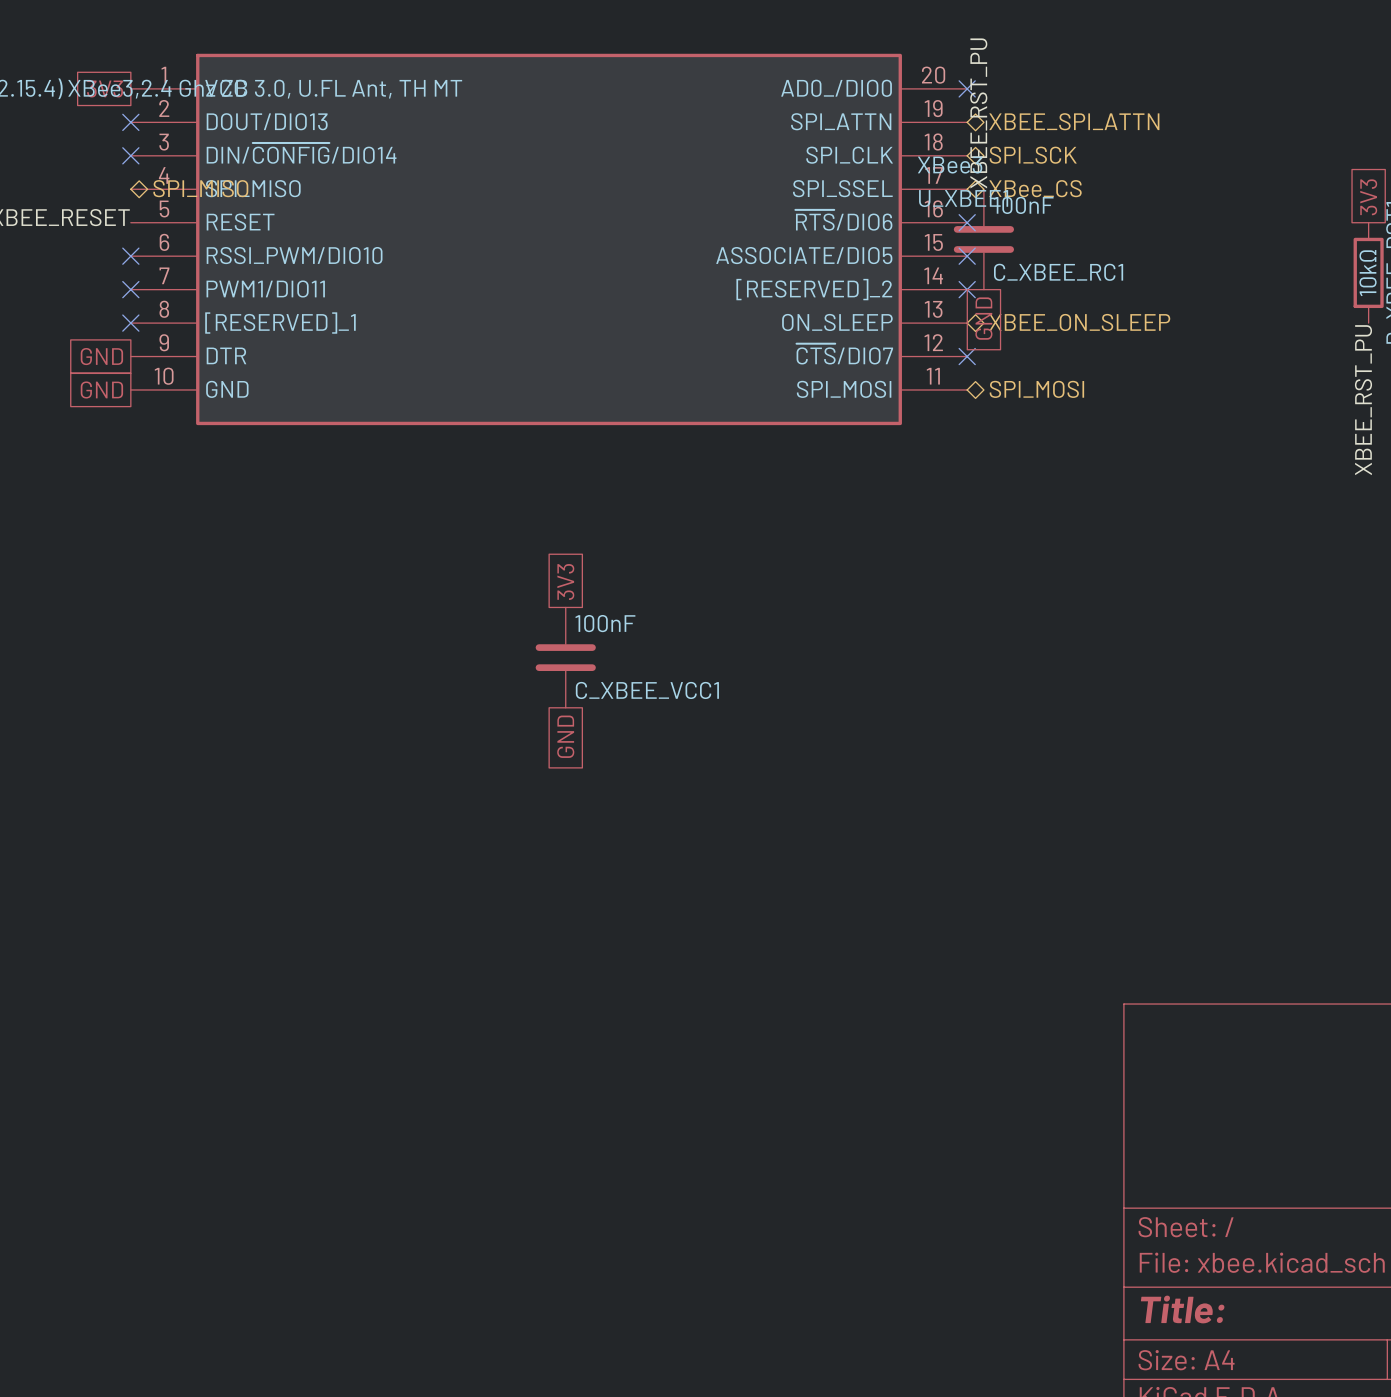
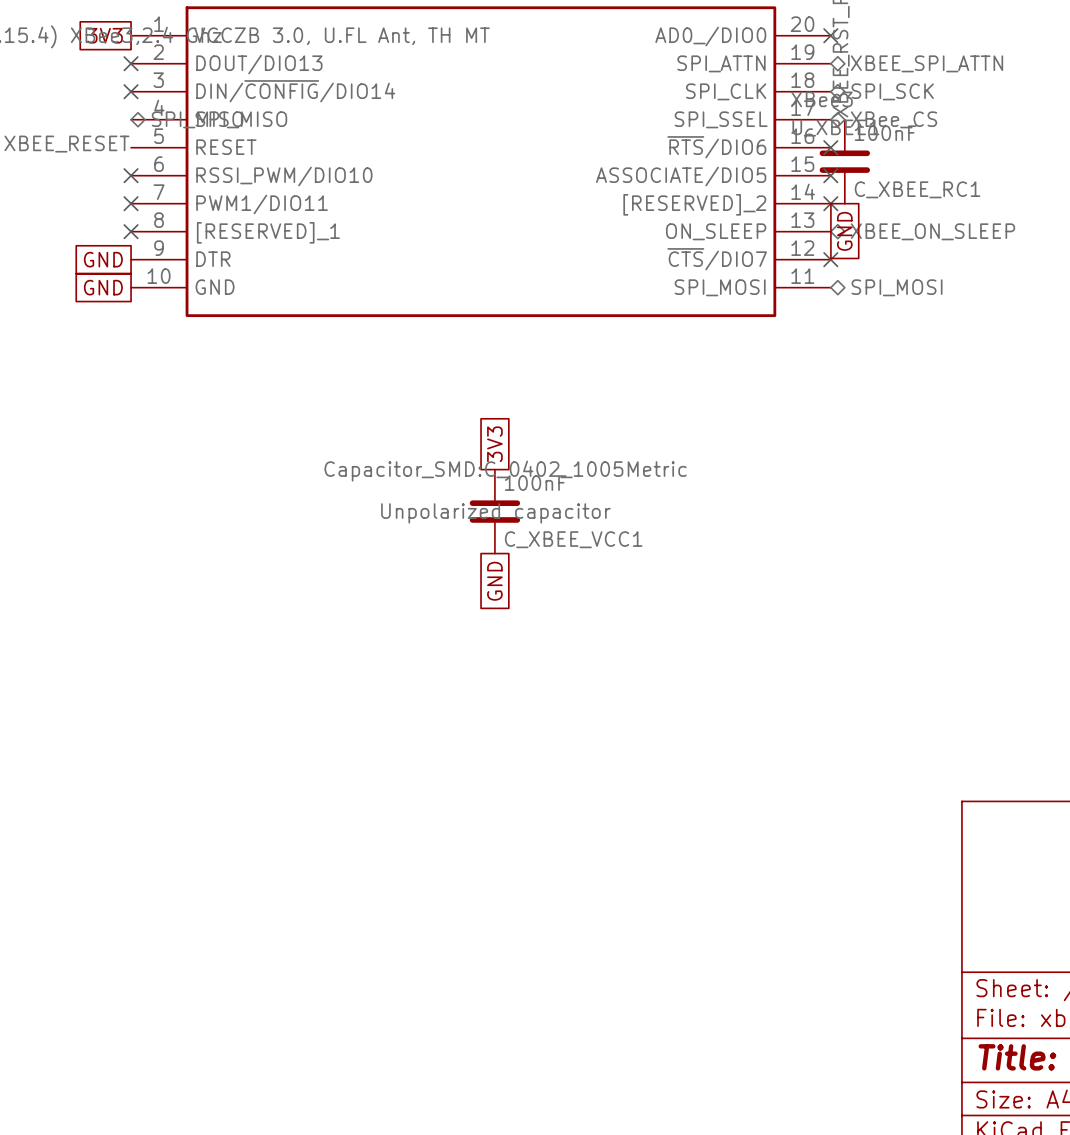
C_XBEE_VCC1 text: none -> Capacitor_SMD:C_0402_1005Metric (505, 471)
C_XBEE_VCC1 text: none -> Unpolarized capacitor (495, 513)

